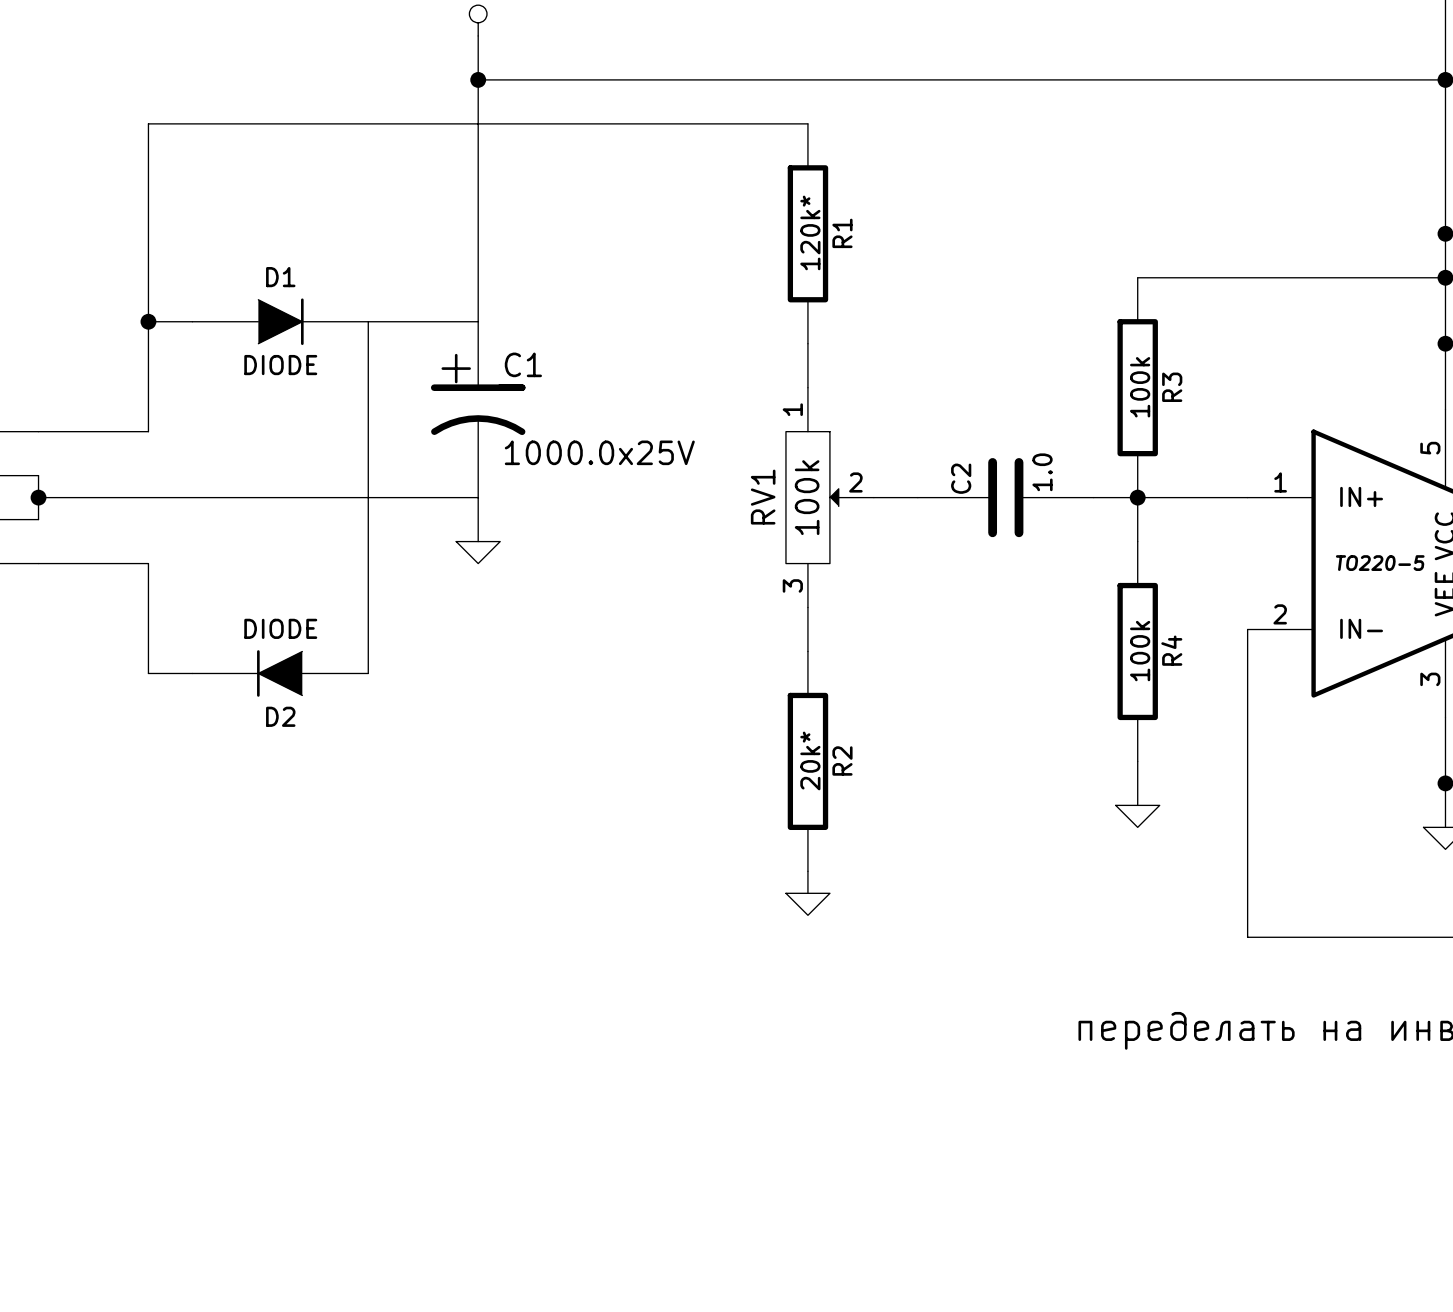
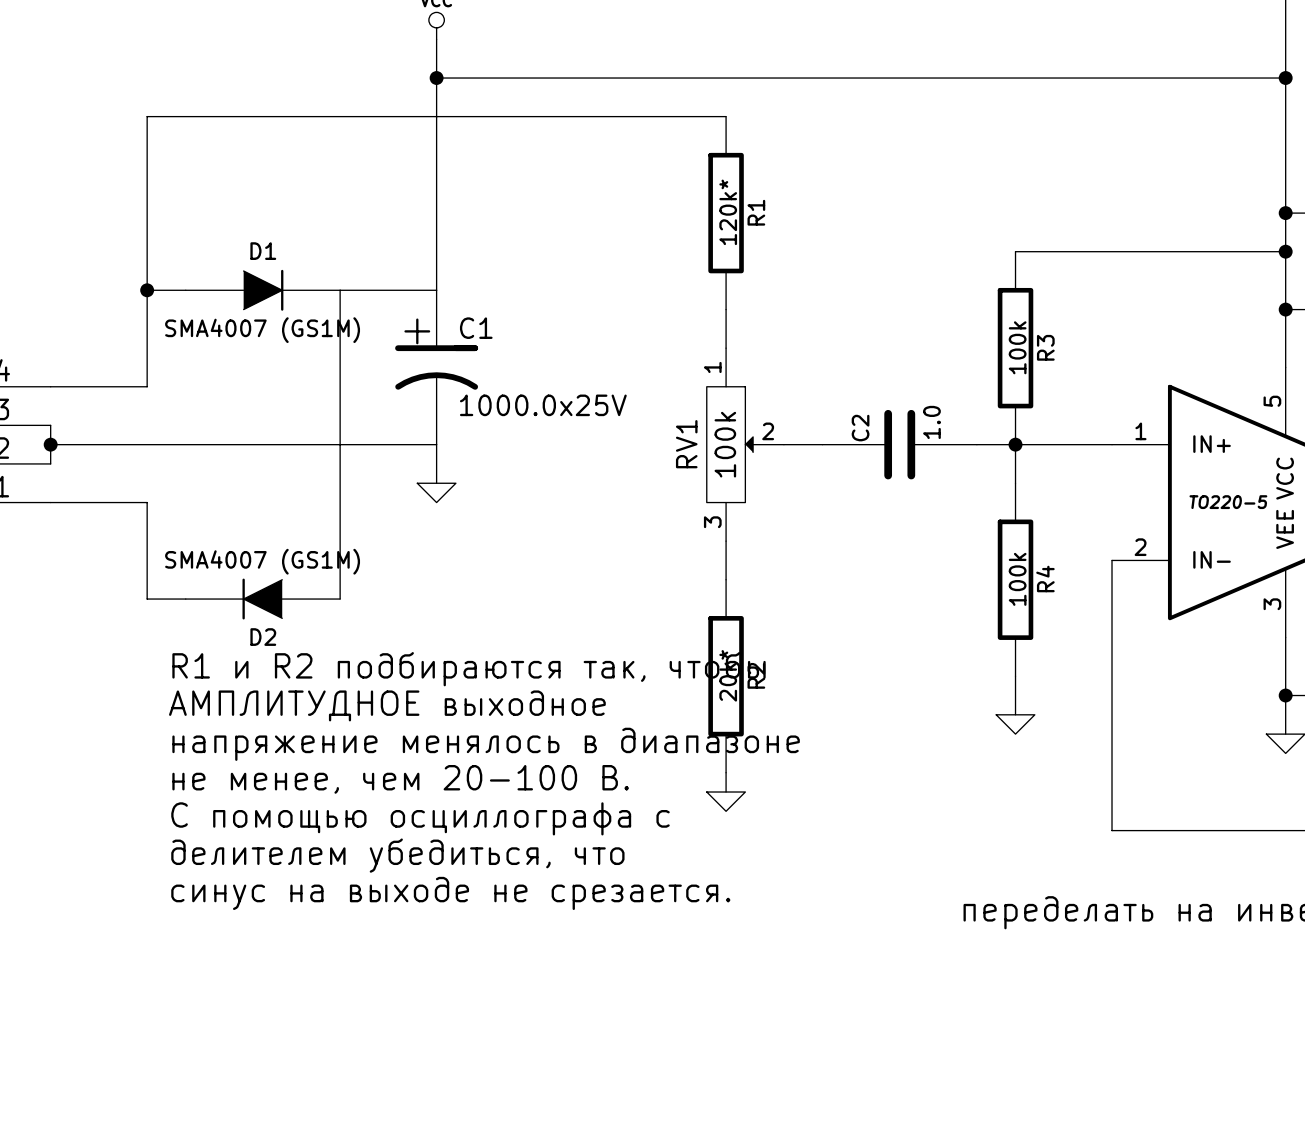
D1 value: DIODE (280, 365) -> SMA4007 (GS1M) (262, 330)
D2 value: DIODE (280, 628) -> SMA4007 (GS1M) (262, 561)
text: none -> R1 и R2 подбираются так, чтобы (469, 669)
text: none -> АМПЛИТУДНОЕ выходное (387, 705)
text: none -> напряжение менялось в диапазоне (486, 744)
text: none -> не менее, чем 20-100 В. (400, 779)
text: none -> С помощью осциллографа с (420, 818)
text: none -> делителем убедиться, что (397, 855)
text: none -> синус на выходе не срезается. (450, 893)

